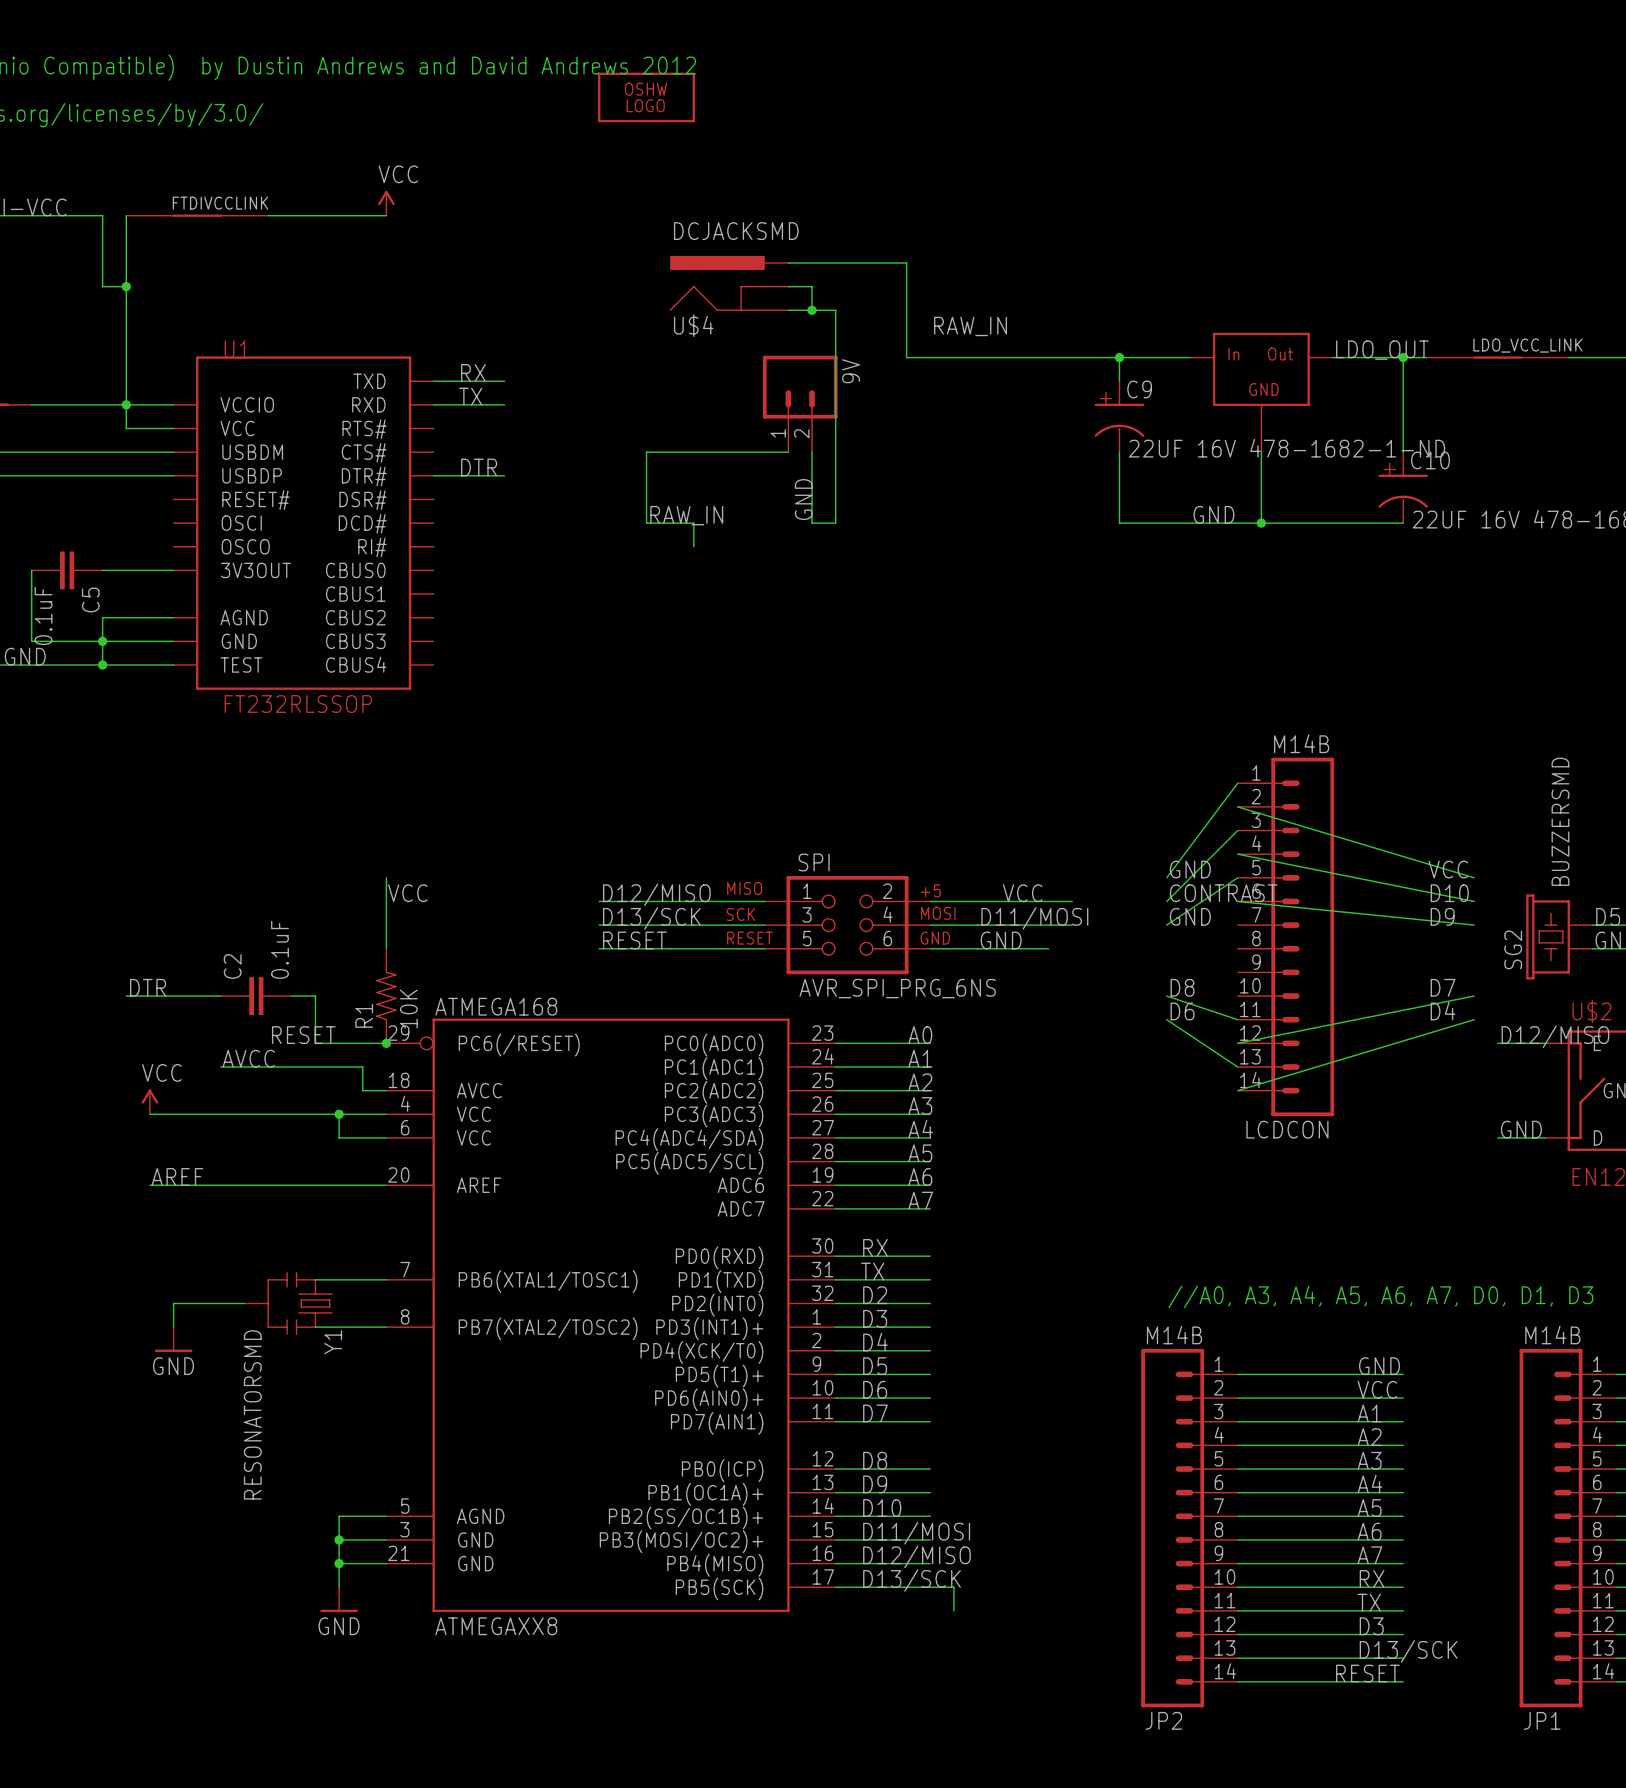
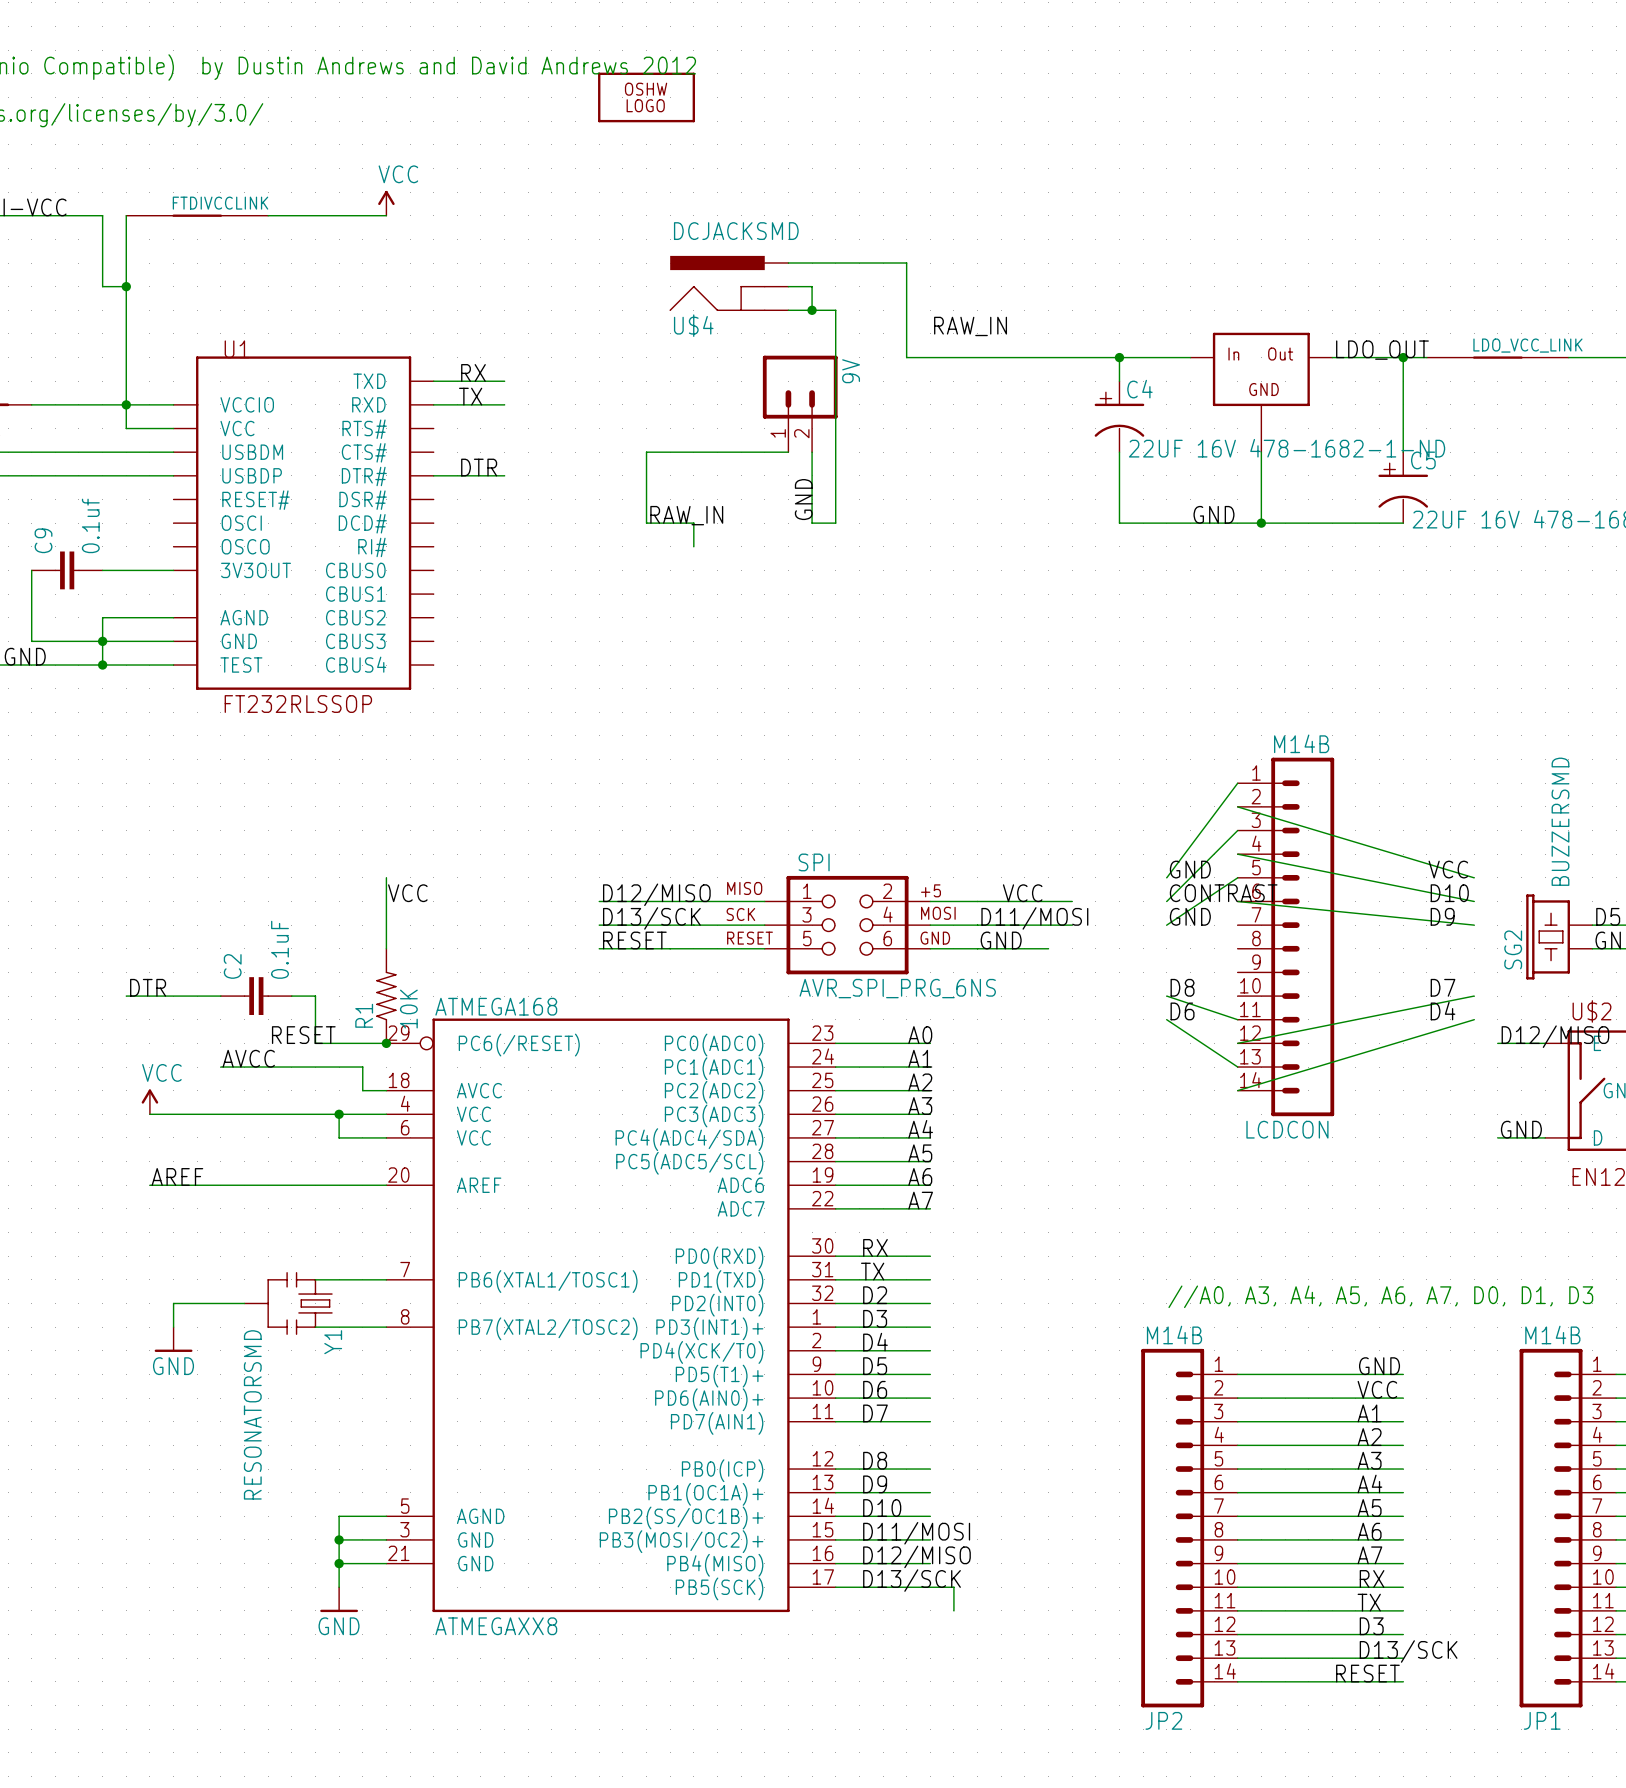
C9 name: C9 (1139, 389) -> C4 (1139, 389)
C10 name: C10 (1430, 460) -> C5 (1423, 460)
C5 name: C5 (90, 600) -> C9 (43, 540)
C5 value: 0.1uF (43, 615) -> 0.1uf (90, 525)

